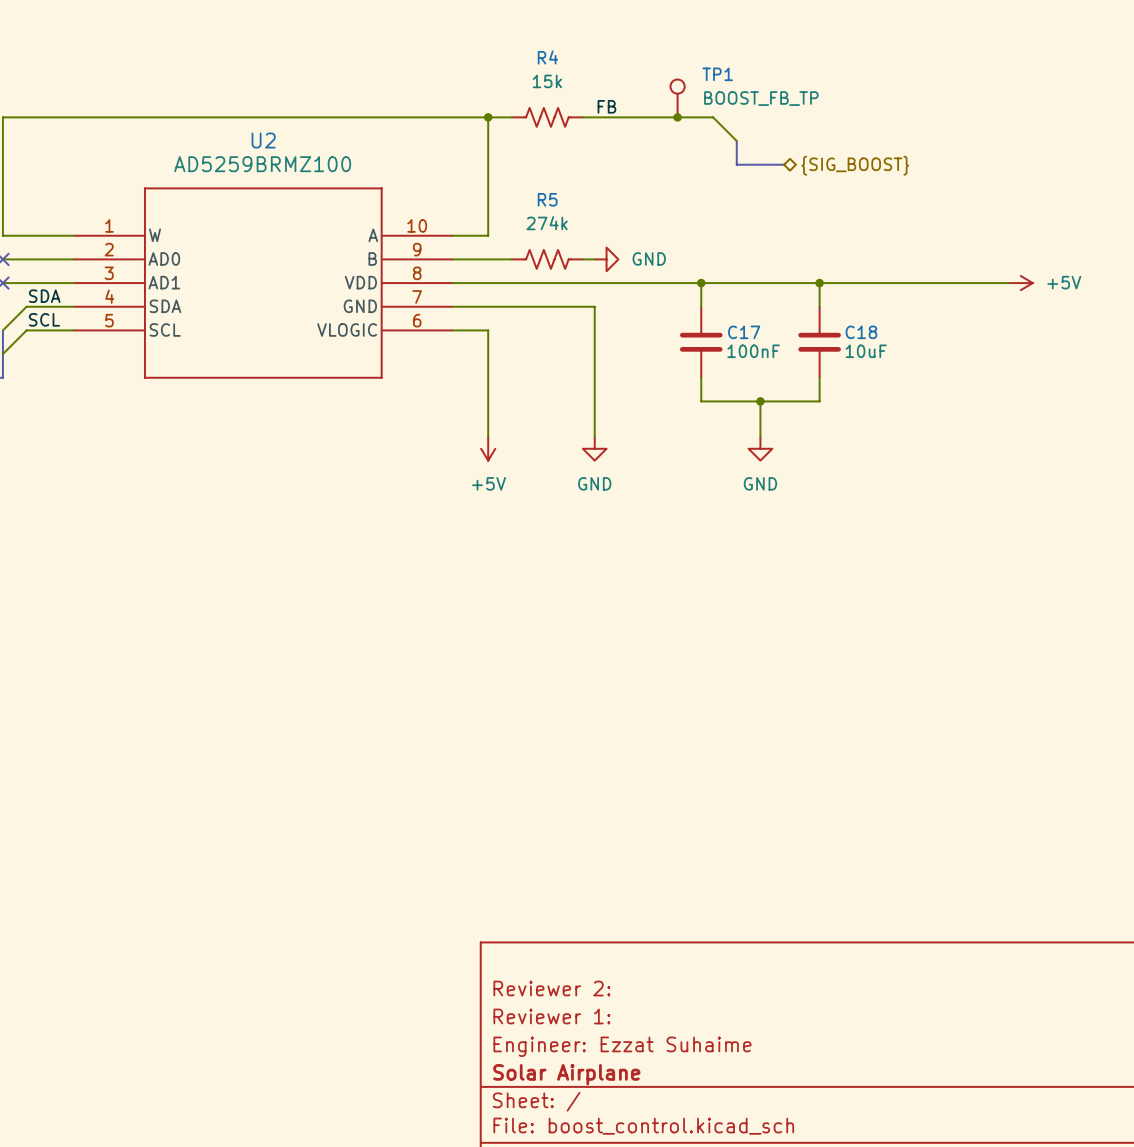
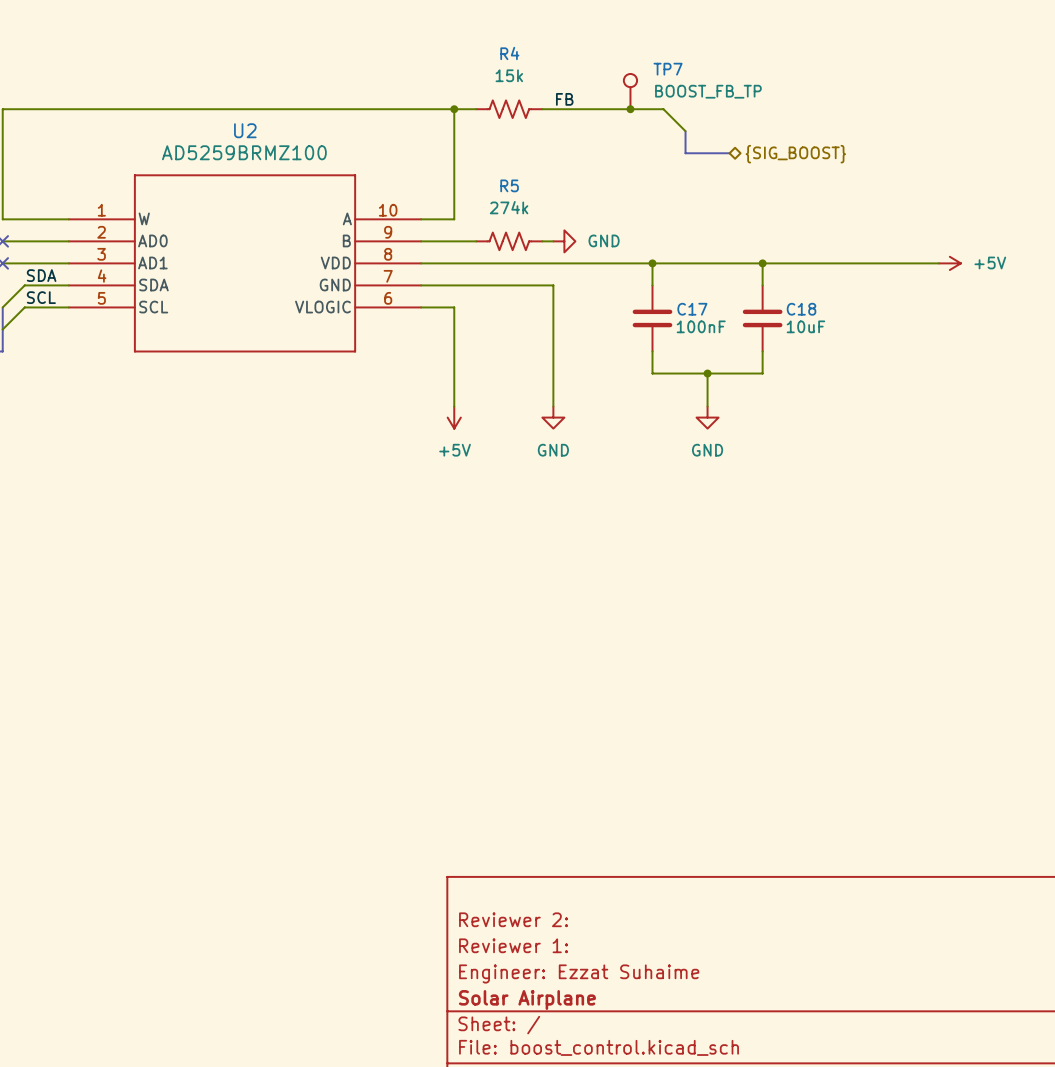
TP1 name: TP1 (717, 74) -> TP7 (668, 69)

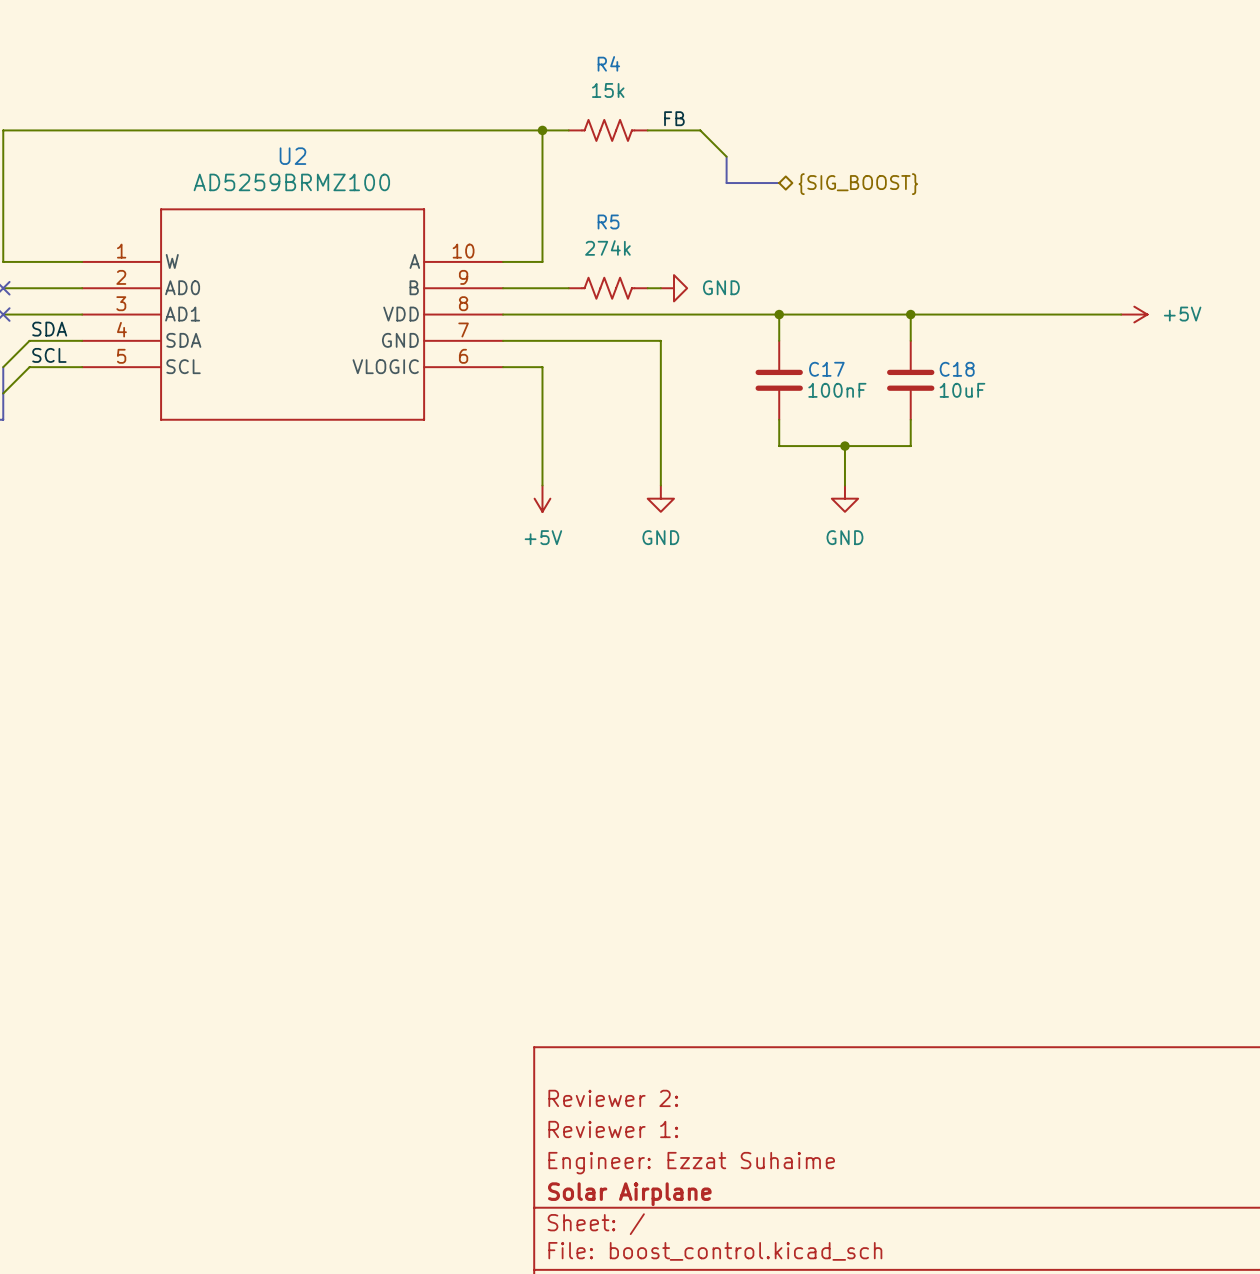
TP7: BOOST_FB_TP (630, 91) -> none
wire: (586, 109) (663, 109) (685, 131) -> (700, 130) (726, 156)
junction: (630, 109) -> none
bus: (685, 131) (685, 153) (729, 153) -> (726, 156) (726, 183) (779, 183)
hierarchical label position: {SIG_BOOST} (795, 154) -> {SIG_BOOST} (858, 184)

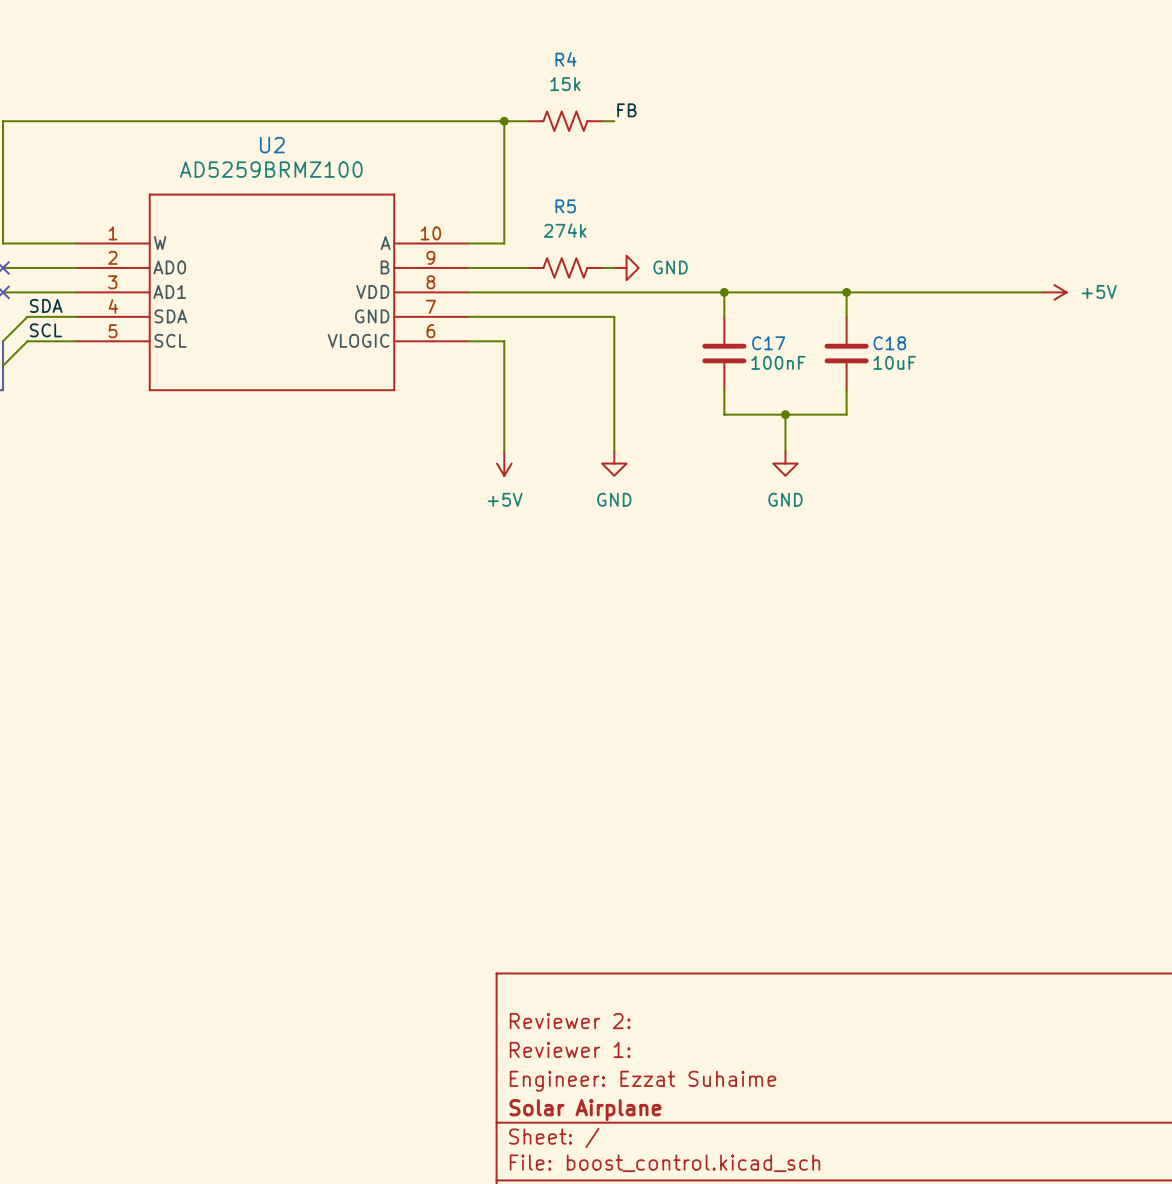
wire: (660, 130) (700, 130) (726, 156) -> none
bus: (726, 156) (726, 183) (779, 183) -> none
hierarchical label: {SIG_BOOST} (858, 184) -> none

